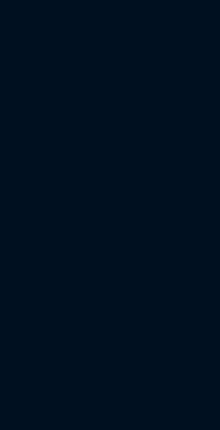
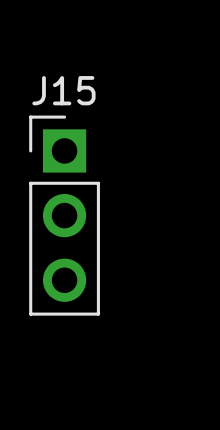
J15: none -> (64, 215)

